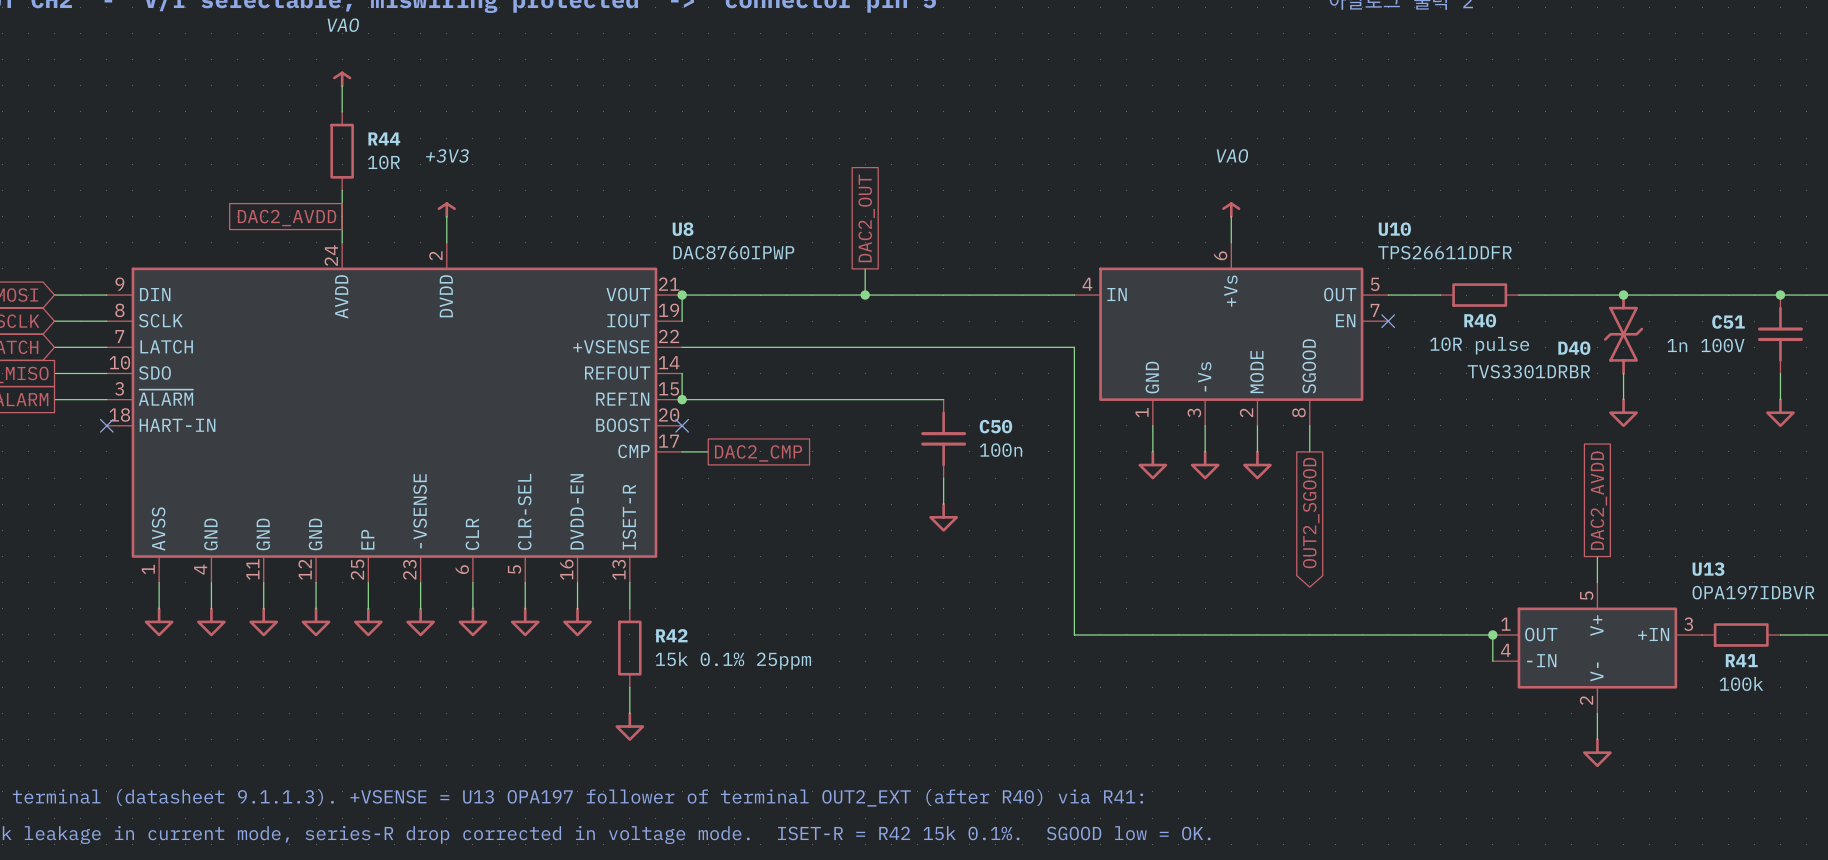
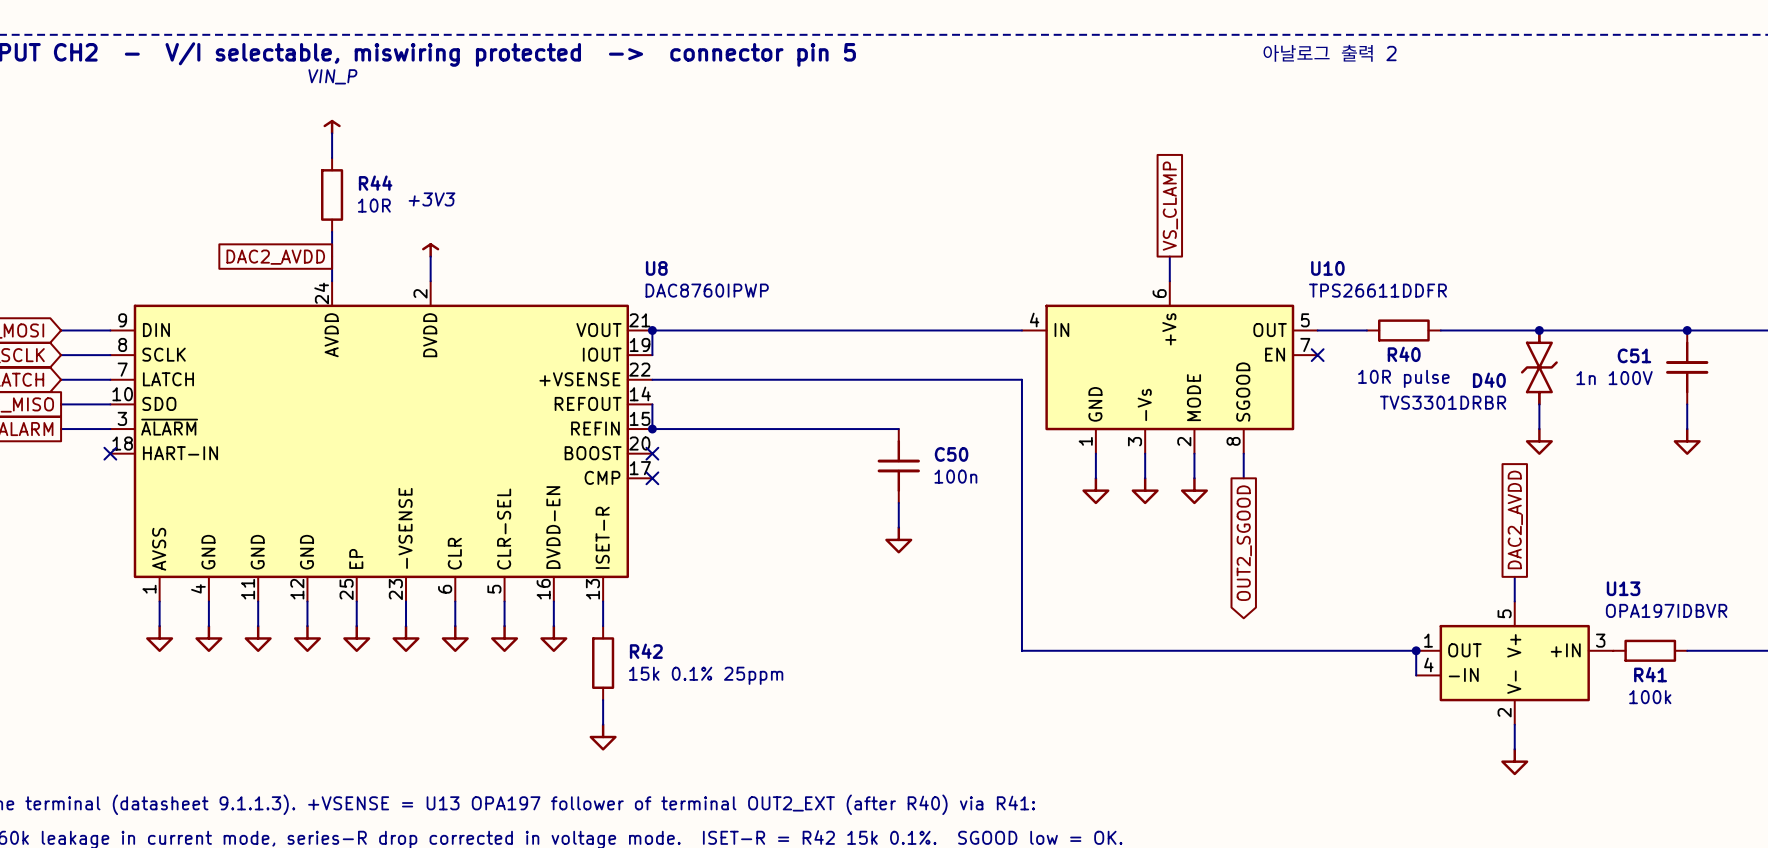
power symbol: VAO (342, 79) -> VIN_P (332, 127)
global label: none -> VS_CLAMP (1170, 206)
power symbol: VAO (1231, 210) -> none
global label: DAC2_OUT (866, 218) -> none
wire: (865, 268) (865, 295) -> none
junction: (865, 295) -> none
wire: (682, 451) (708, 451) -> none
no-connect mark: none -> (652, 478)
global label: DAC2_CMP (758, 453) -> none

